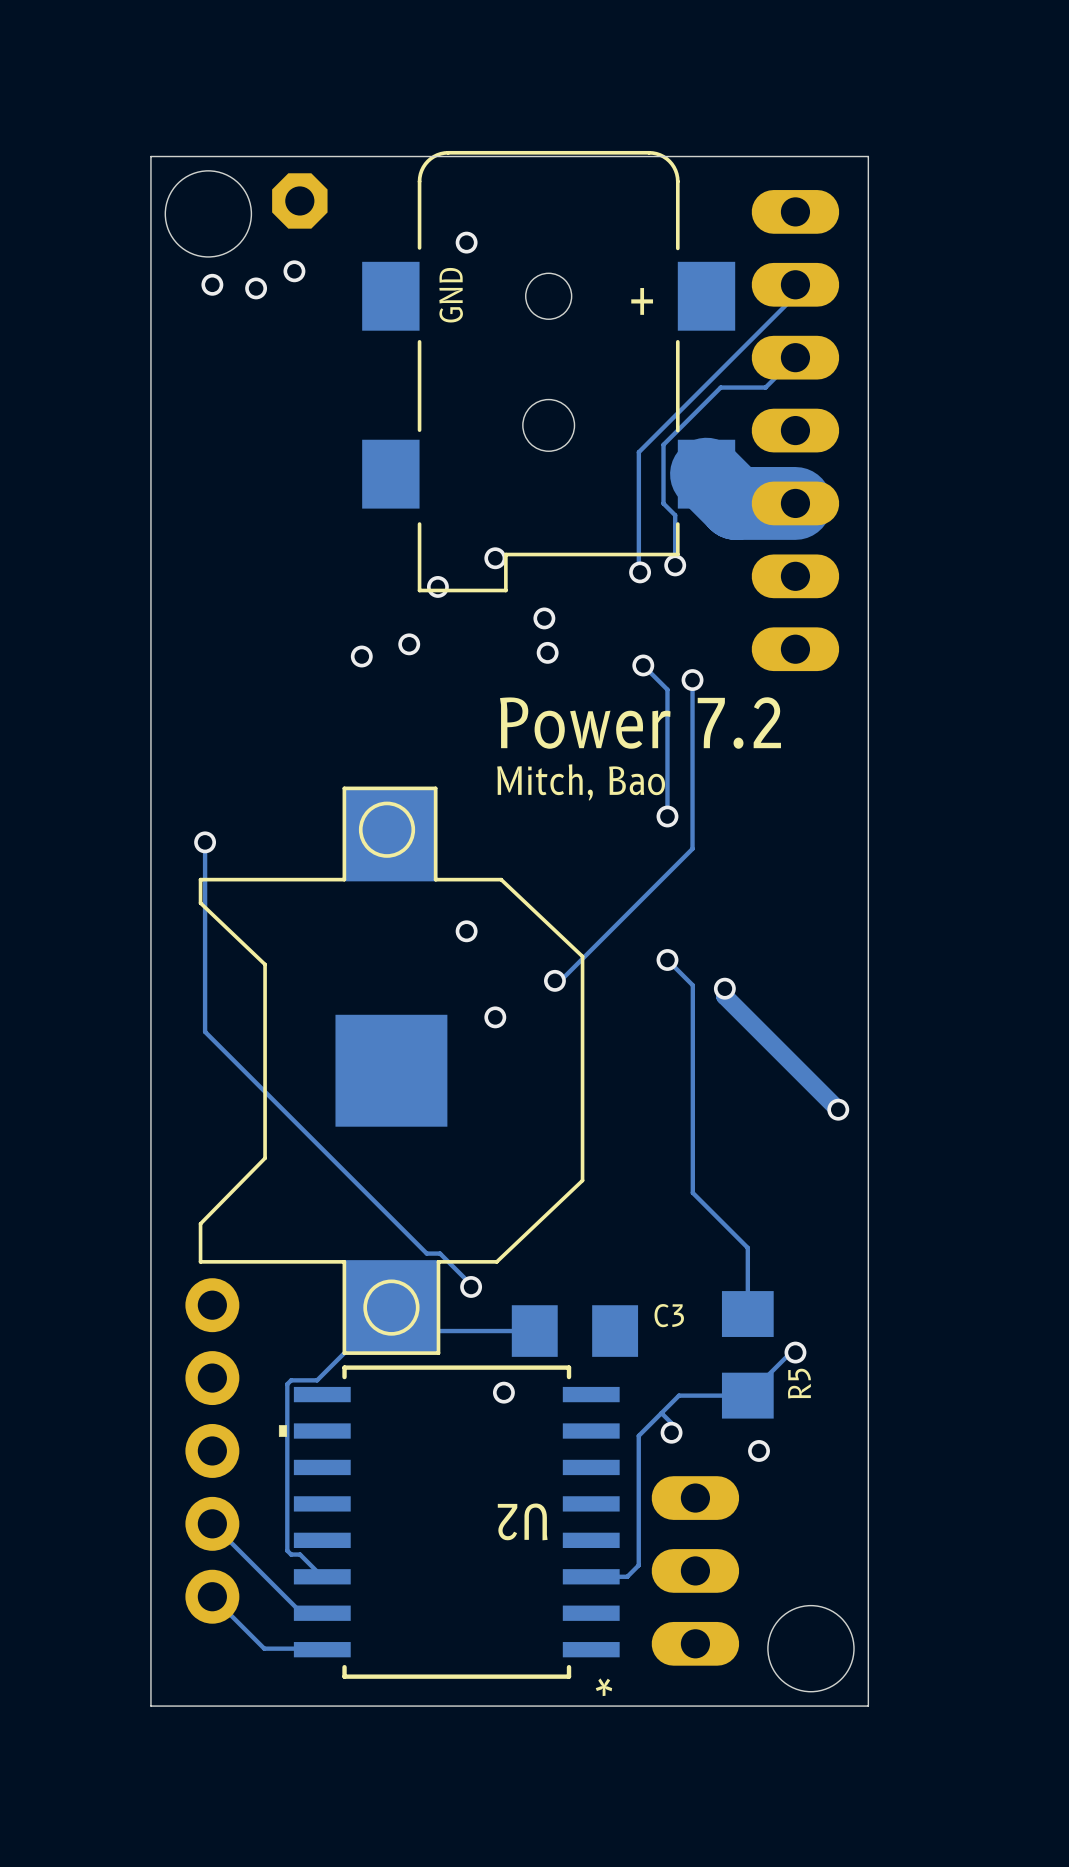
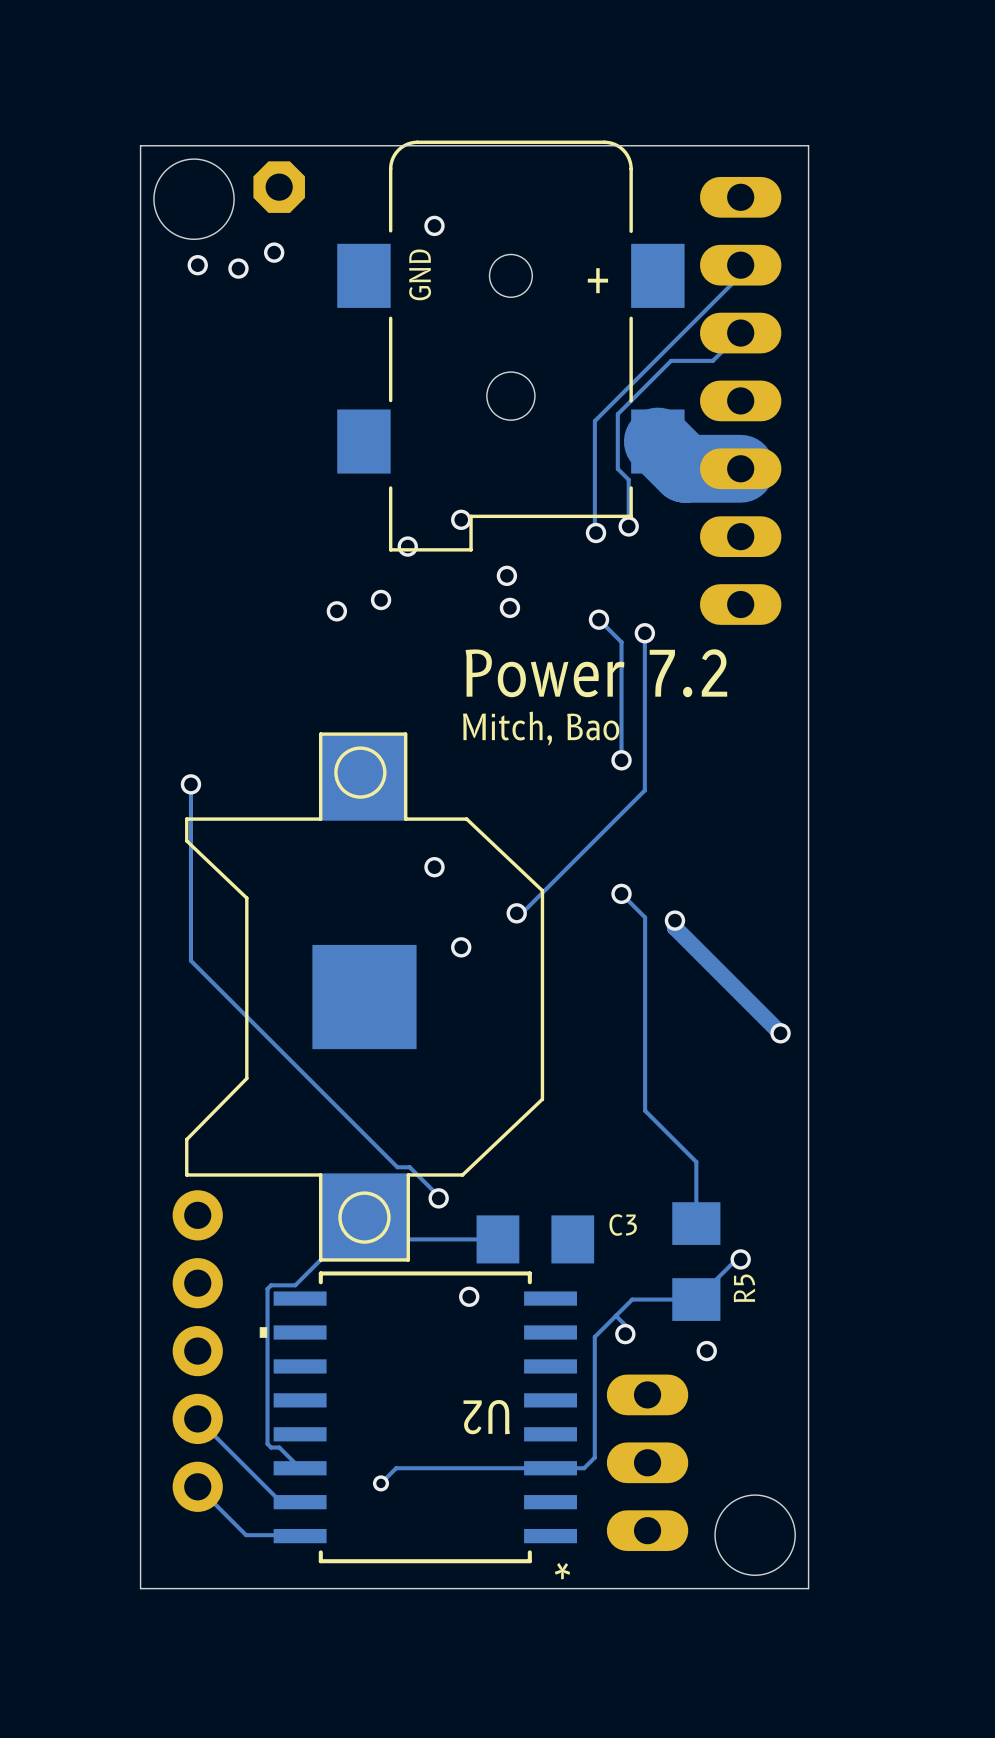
track: none -> (550, 1468) (396, 1468) (380, 1483)
via: none -> (380, 1483)

